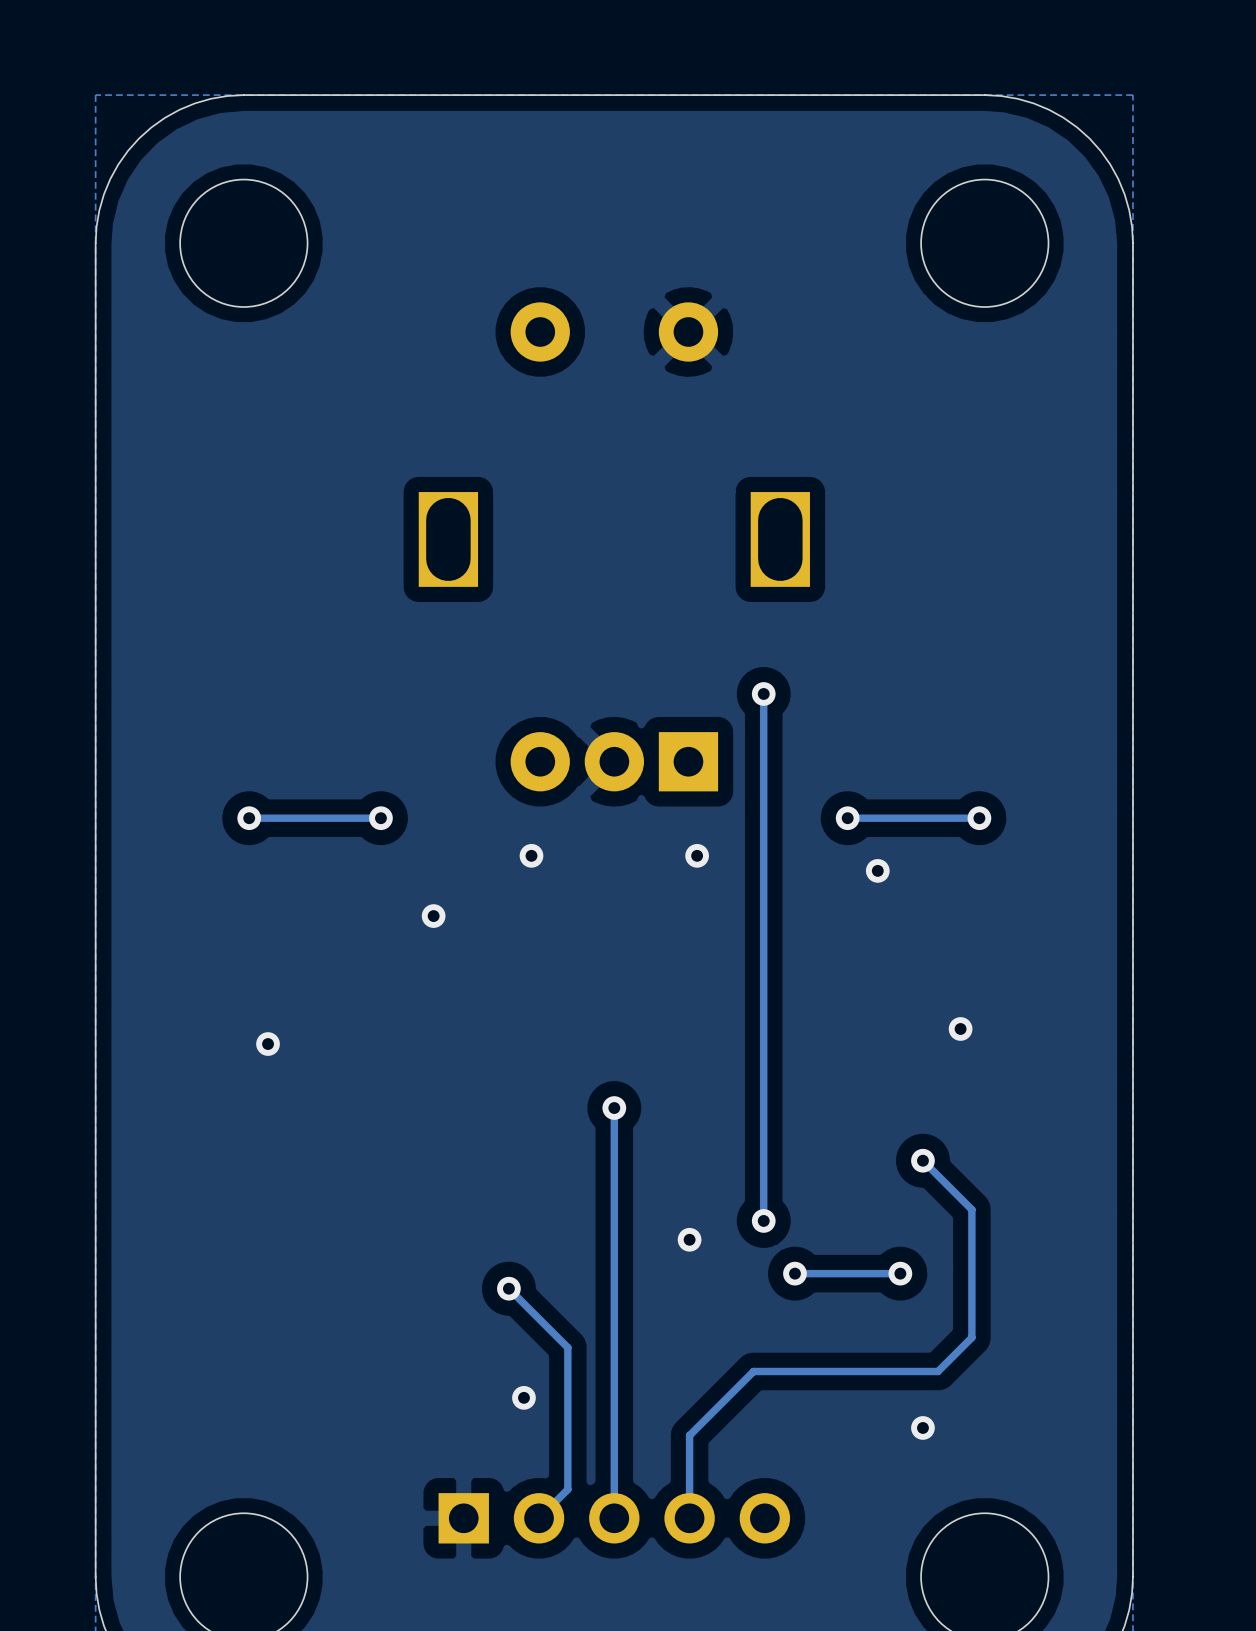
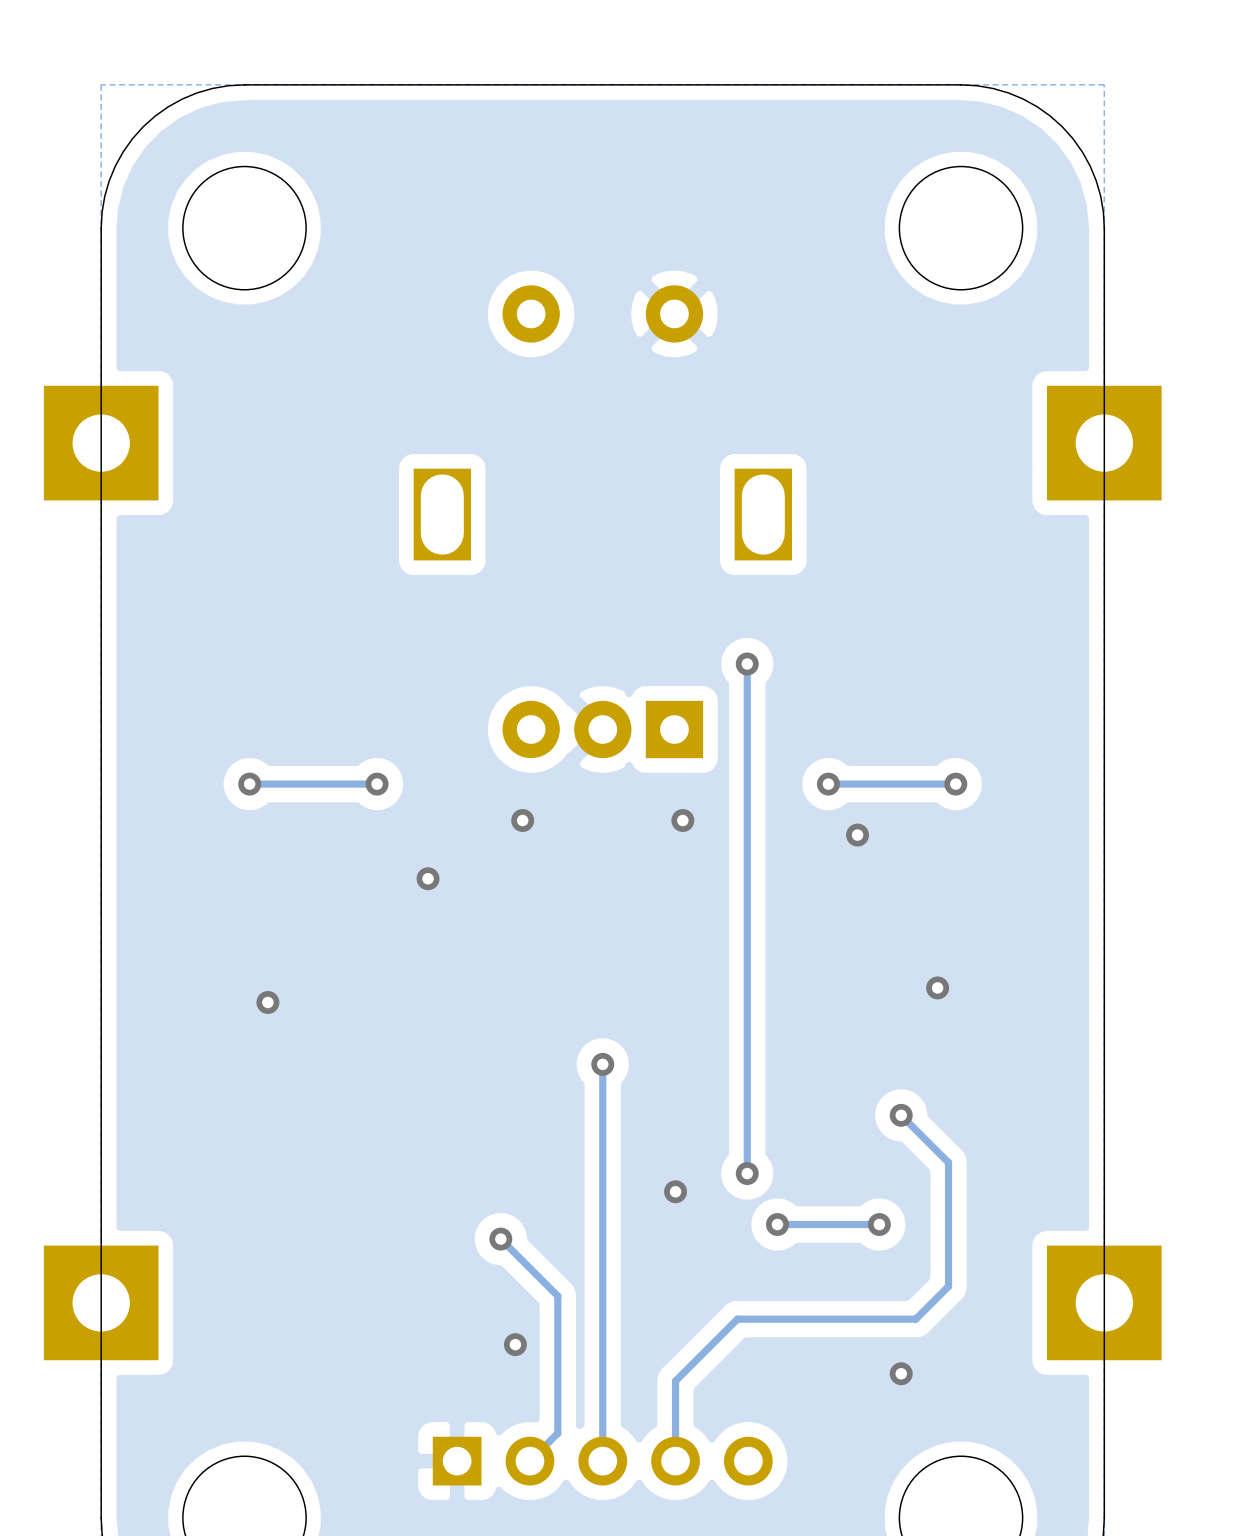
part: none -> (101, 443)
part: none -> (1104, 443)
part: none -> (101, 1302)
part: none -> (1104, 1302)

